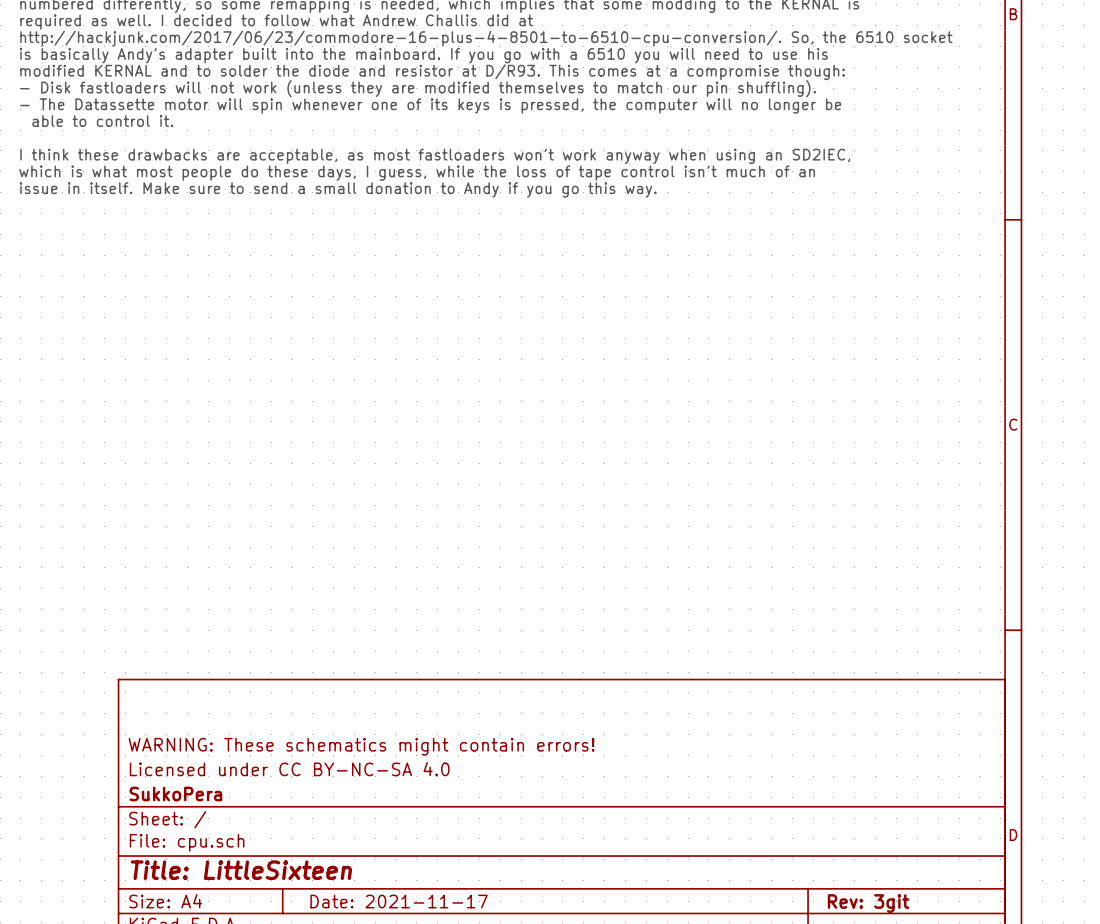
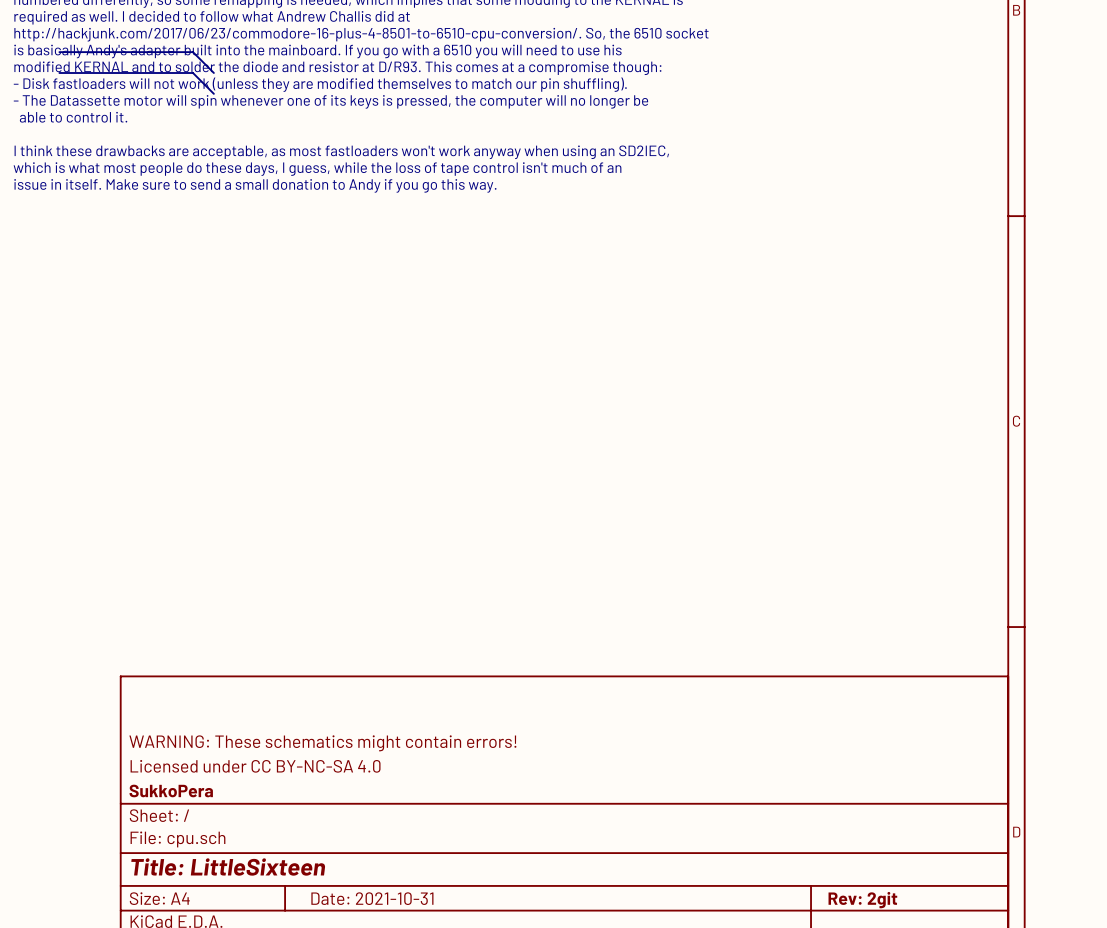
wire: none -> (59, 52) (193, 52) (213, 72)
wire: none -> (59, 72) (193, 72) (213, 93)
title block: Date: 2021-11-17 (399, 901) -> Date: 2021-10-31 (372, 898)
title block: Rev: 3git (868, 903) -> Rev: 2git (862, 900)

